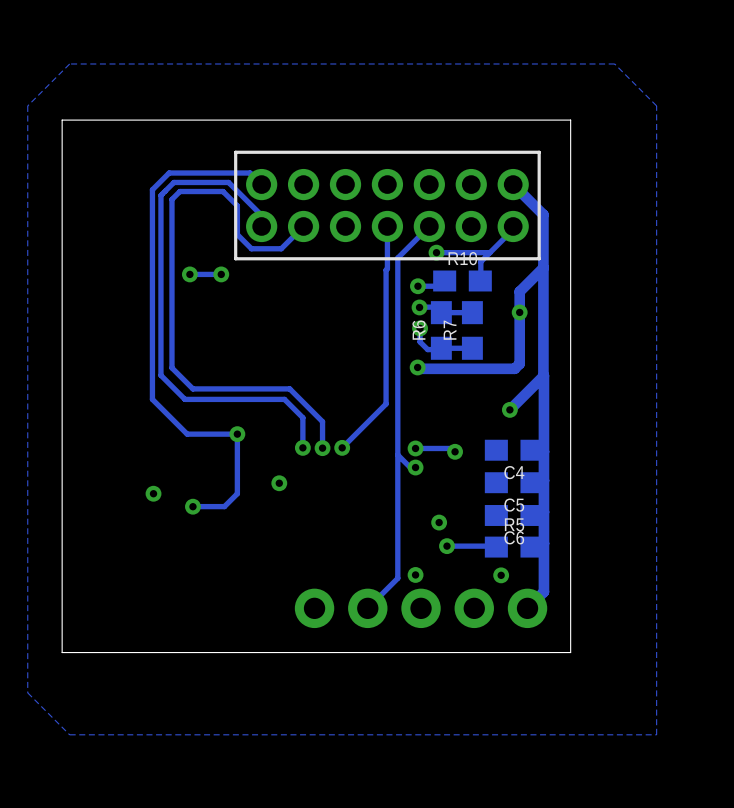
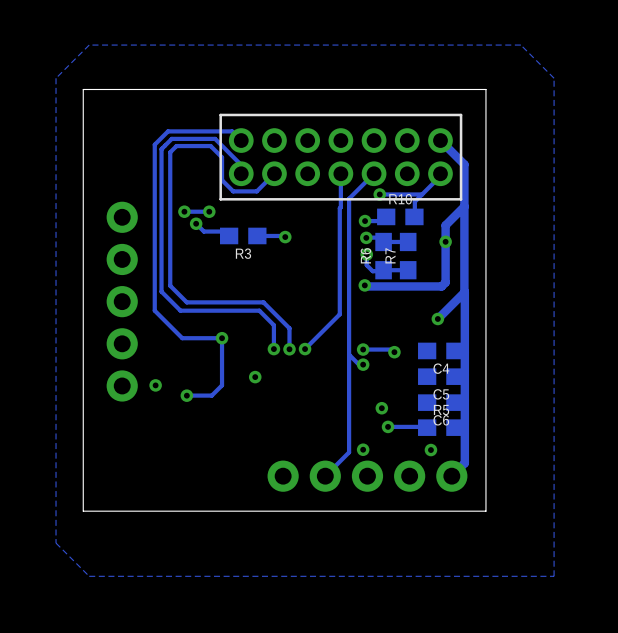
track: none -> (196, 223) (203, 231) (224, 231) (229, 235)
via: none -> (196, 223)
R3: none -> (243, 235)
track: none -> (257, 235) (285, 237)
via: none -> (285, 237)
part: none -> (122, 301)

